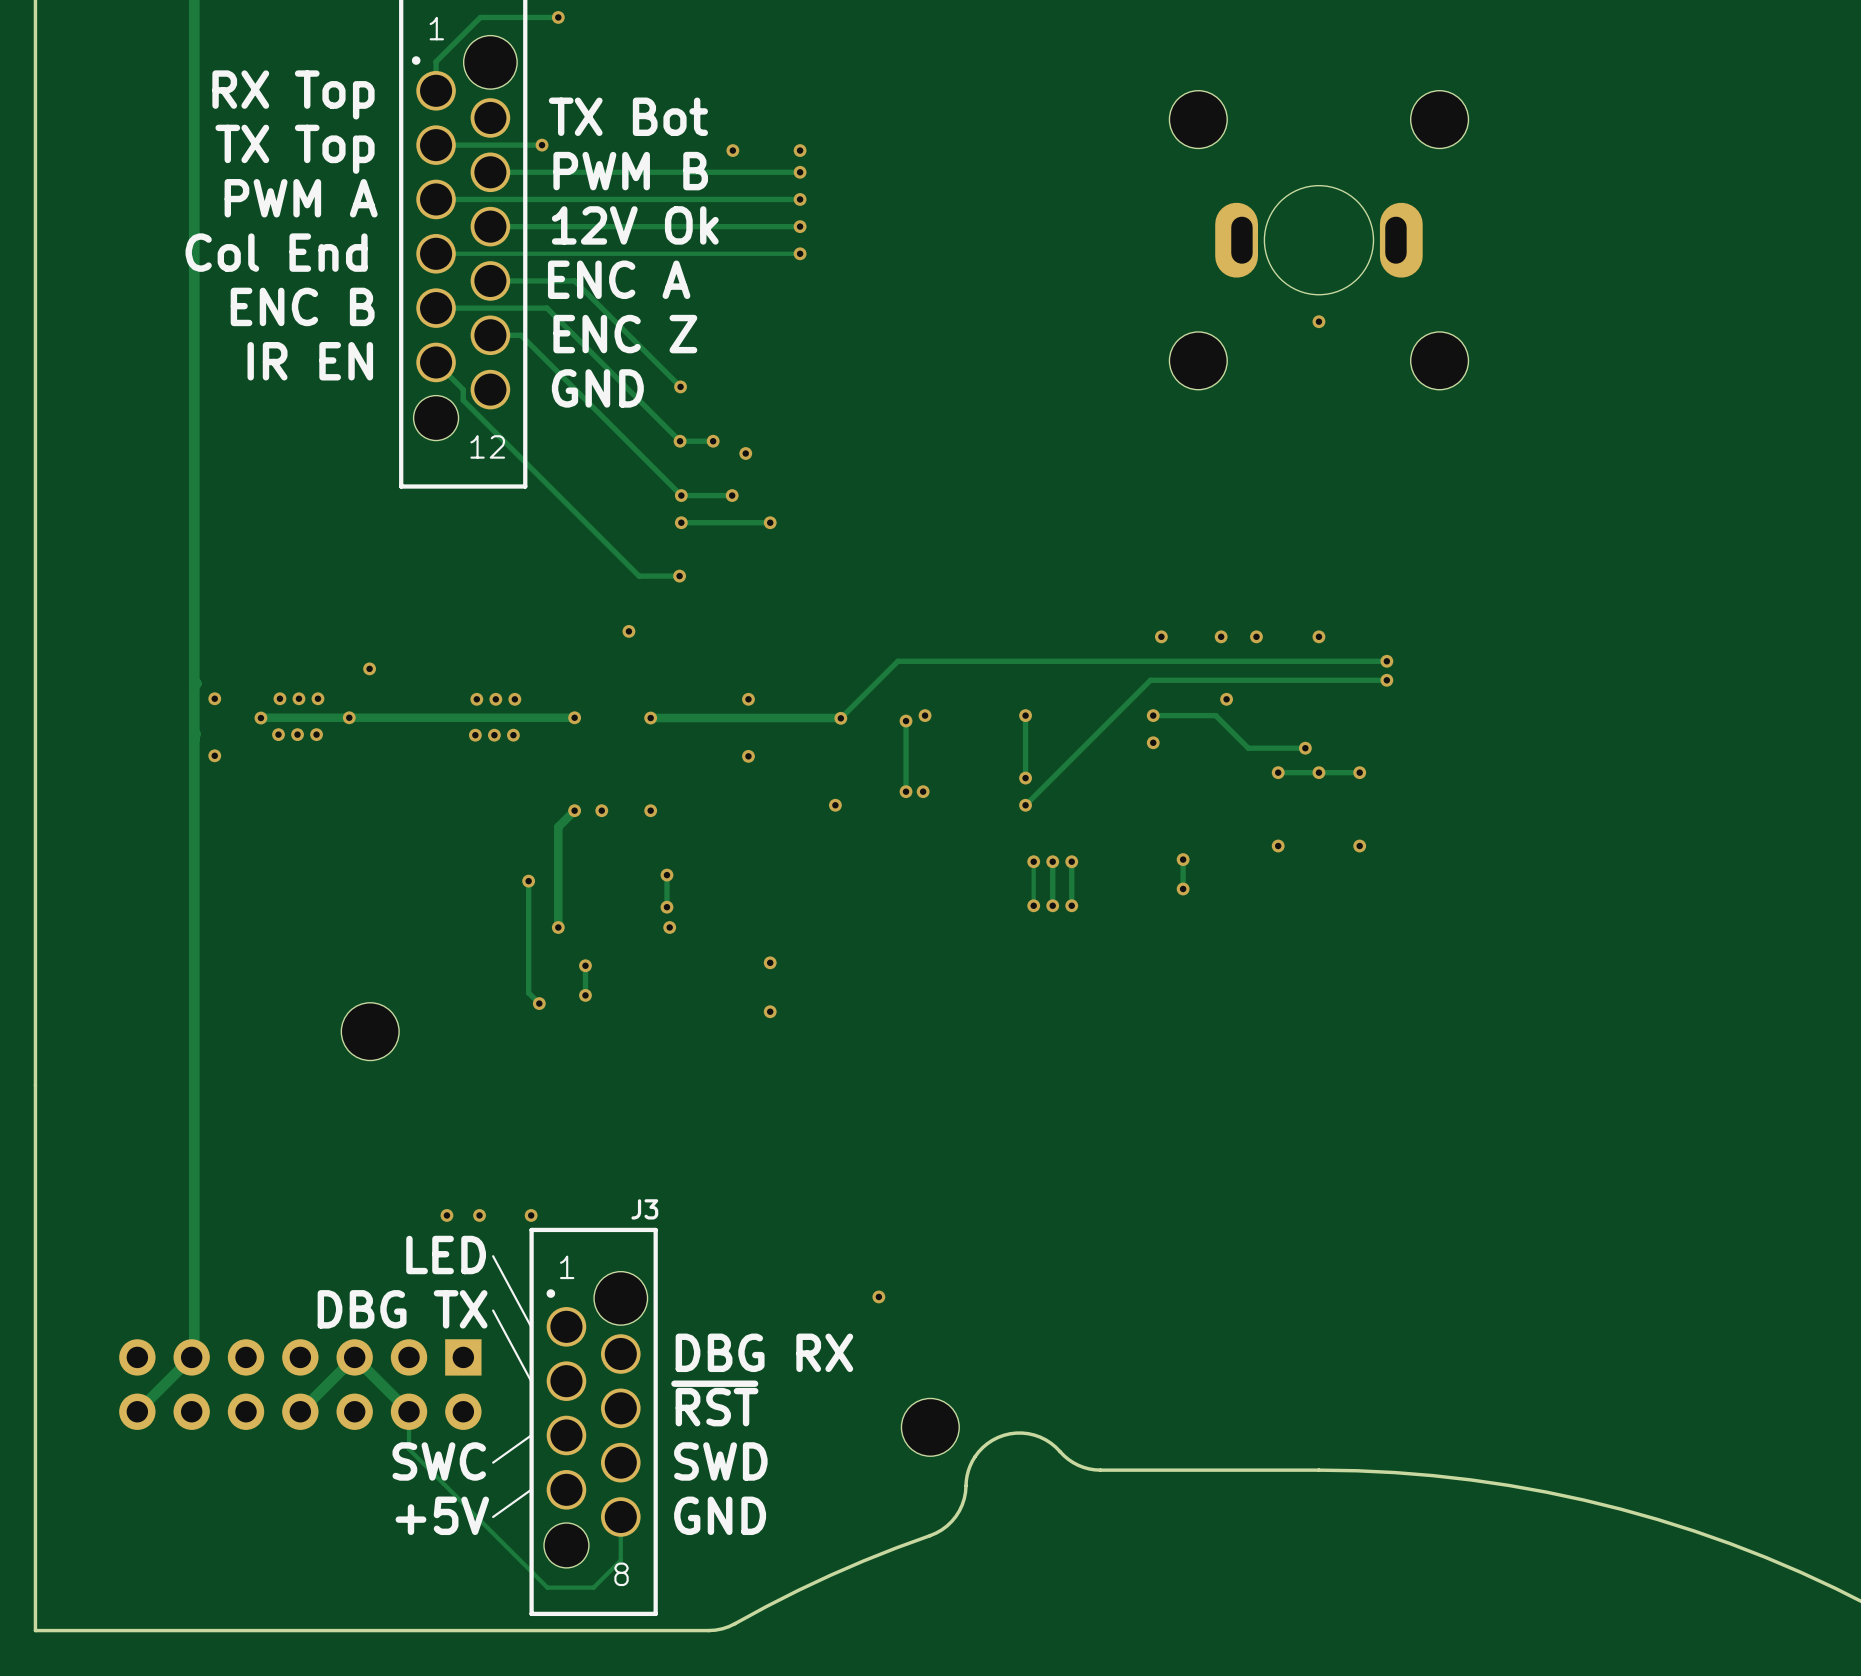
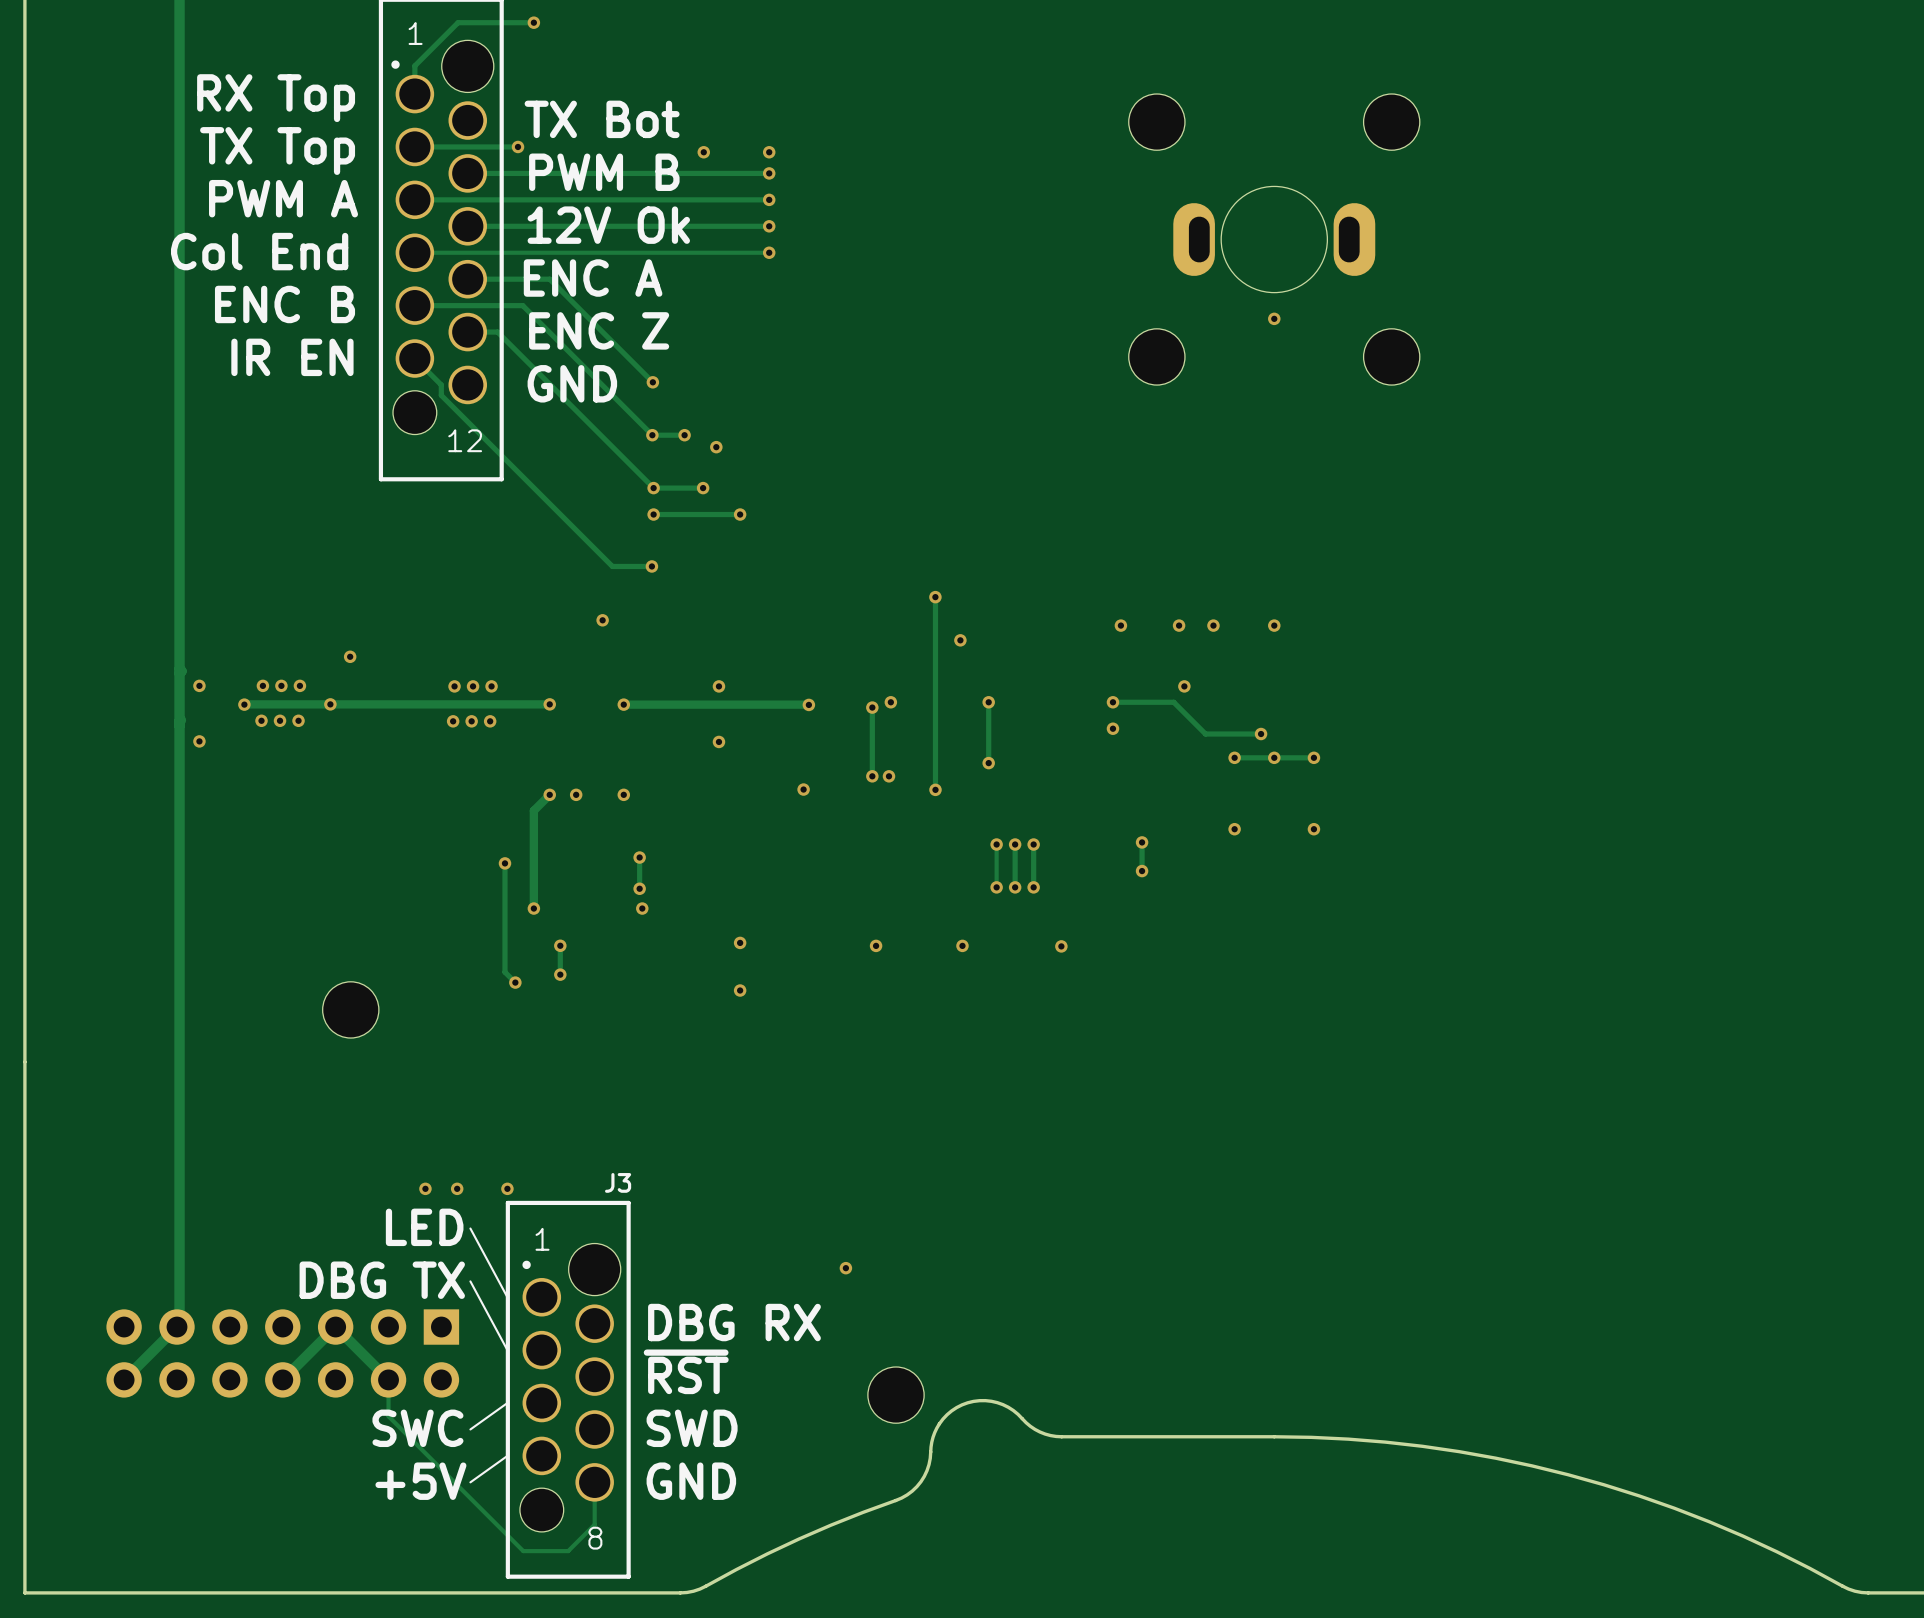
track: none -> (935, 597) (935, 789)
via: none -> (935, 597)
via: none -> (960, 640)
track: (1386, 661) (897, 661) (840, 718) -> none
via: (1386, 661) -> none
track: (1386, 680) (1150, 680) (1025, 805) -> none
via: (1386, 680) -> none
via position: (1025, 805) -> (935, 789)
via: none -> (876, 945)
via: none -> (962, 945)
via: none -> (1061, 946)

